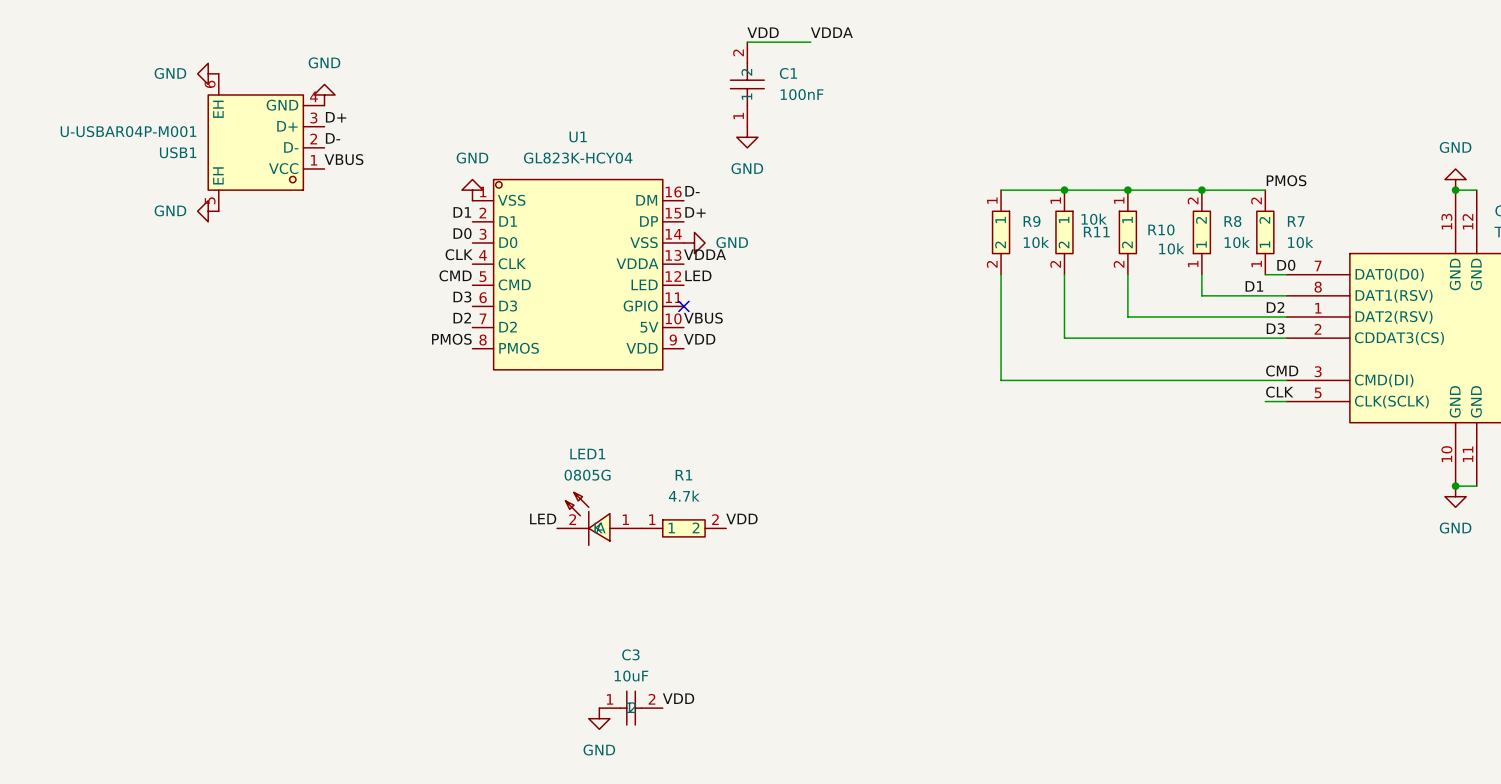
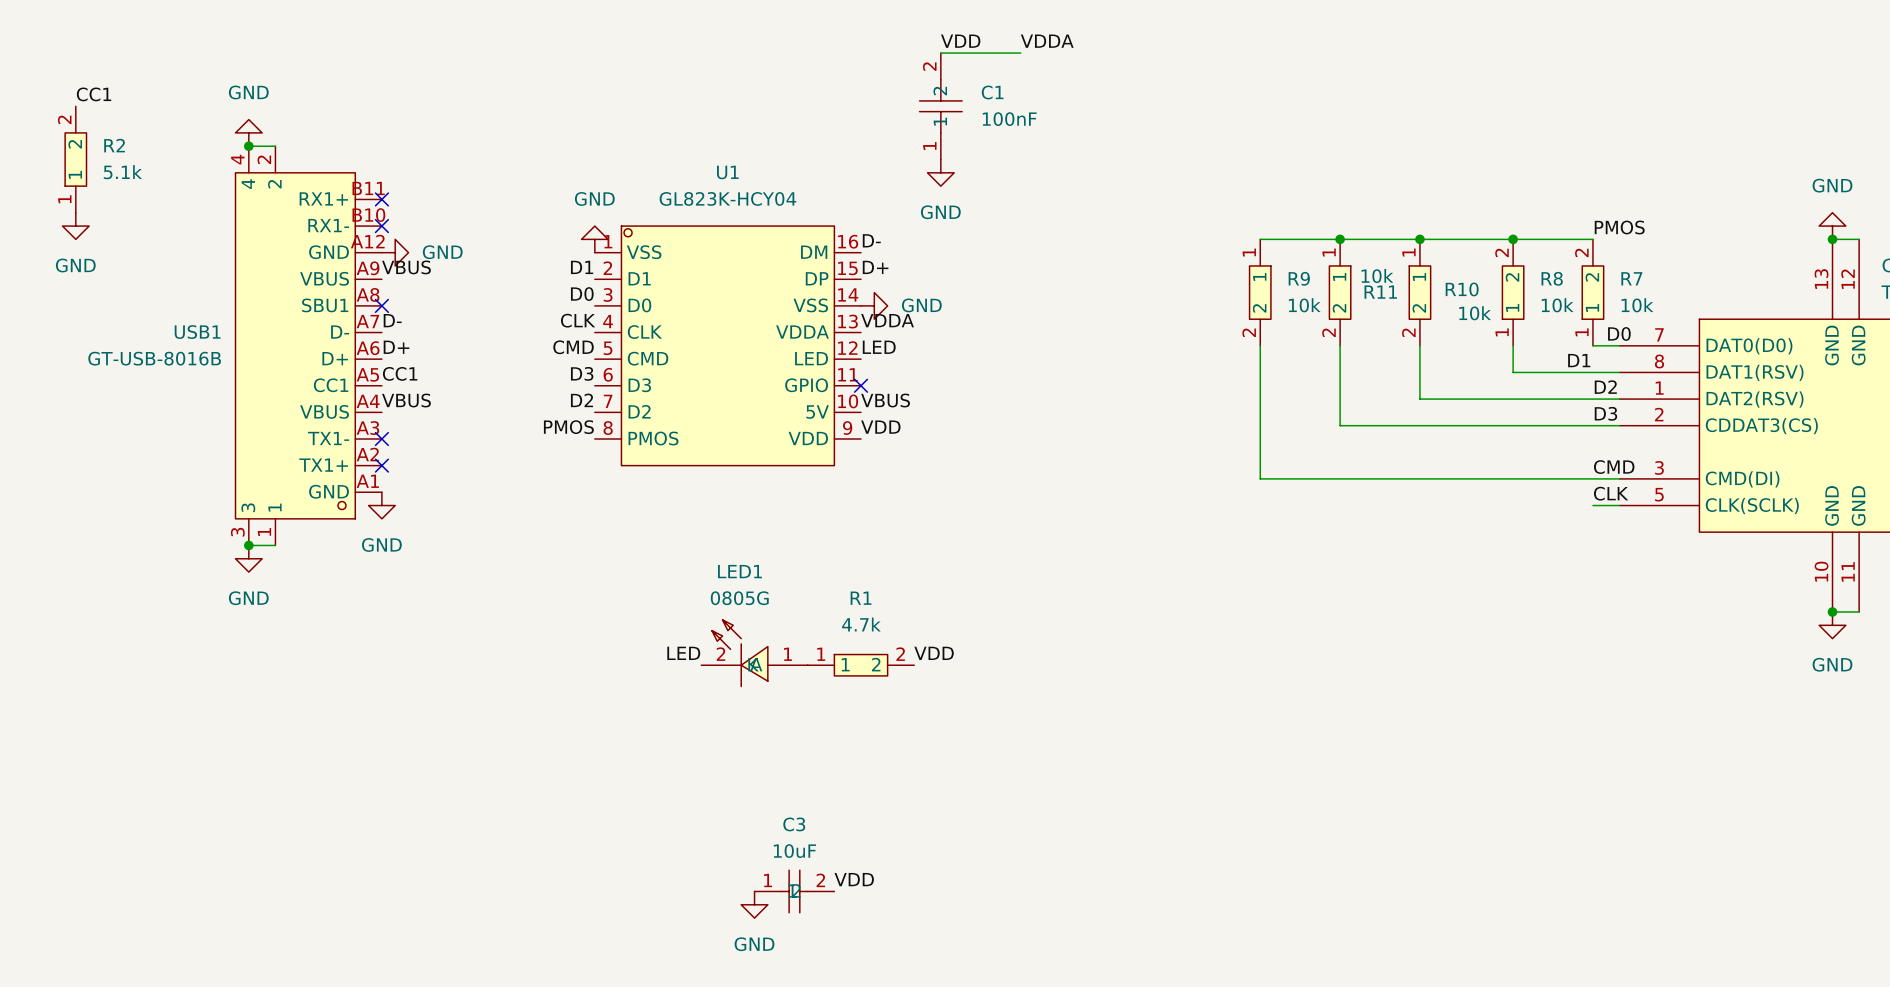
USB1 symbol: [208, 73, 325, 212] -> [235, 146, 382, 546]
power symbol rotation: 0° (208, 73) -> 90° clockwise (248, 132)
power symbol position: GND (208, 73) -> GND (248, 132)
label: none -> CC1 (94, 94)
power symbol: GND (324, 95) -> none
junction: none -> (248, 146)
label position: D+ (336, 117) -> D+ (396, 347)
R2: none -> 5.1k (75, 159)
USB1 value: U-USBAR04P-M001 (128, 131) -> GT-USB-8016B (154, 358)
label position: D- (333, 138) -> D- (392, 320)
USB1 name position: USB1 (178, 152) -> USB1 (197, 332)
no-connect mark: none -> (381, 199)
label position: VBUS (343, 159) -> VBUS (406, 267)
power symbol: none -> GND (75, 226)
no-connect mark: none -> (381, 226)
power symbol: none -> GND (395, 252)
power symbol: GND (208, 211) -> none
no-connect mark: none -> (381, 305)
label: none -> CC1 (400, 373)
label: none -> VBUS (406, 400)
no-connect mark: none -> (381, 438)
no-connect mark: none -> (381, 465)
power symbol: none -> GND (381, 505)
wire: none -> (248, 545) (275, 545)
junction: none -> (248, 545)
power symbol: none -> GND (248, 558)

